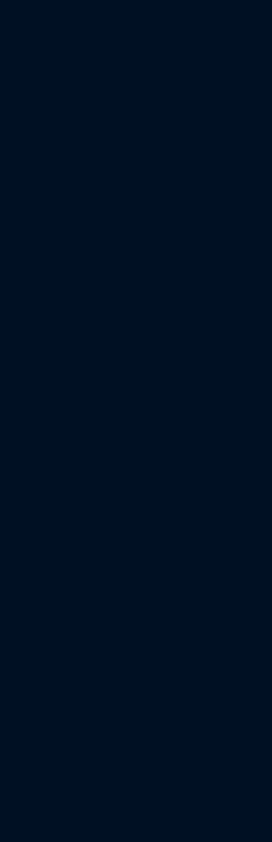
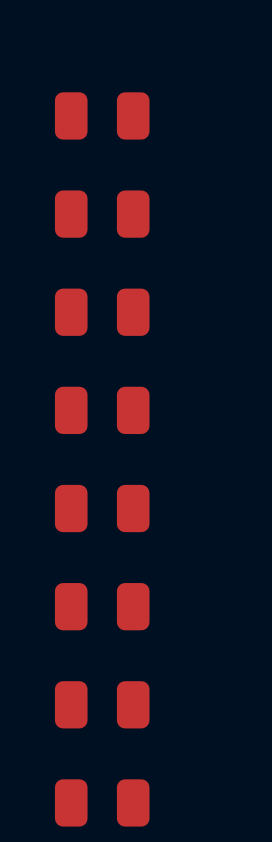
part: none -> (102, 115)
part: none -> (102, 214)
part: none -> (102, 312)
part: none -> (102, 410)
part: none -> (102, 508)
part: none -> (102, 606)
part: none -> (102, 704)
part: none -> (102, 802)

